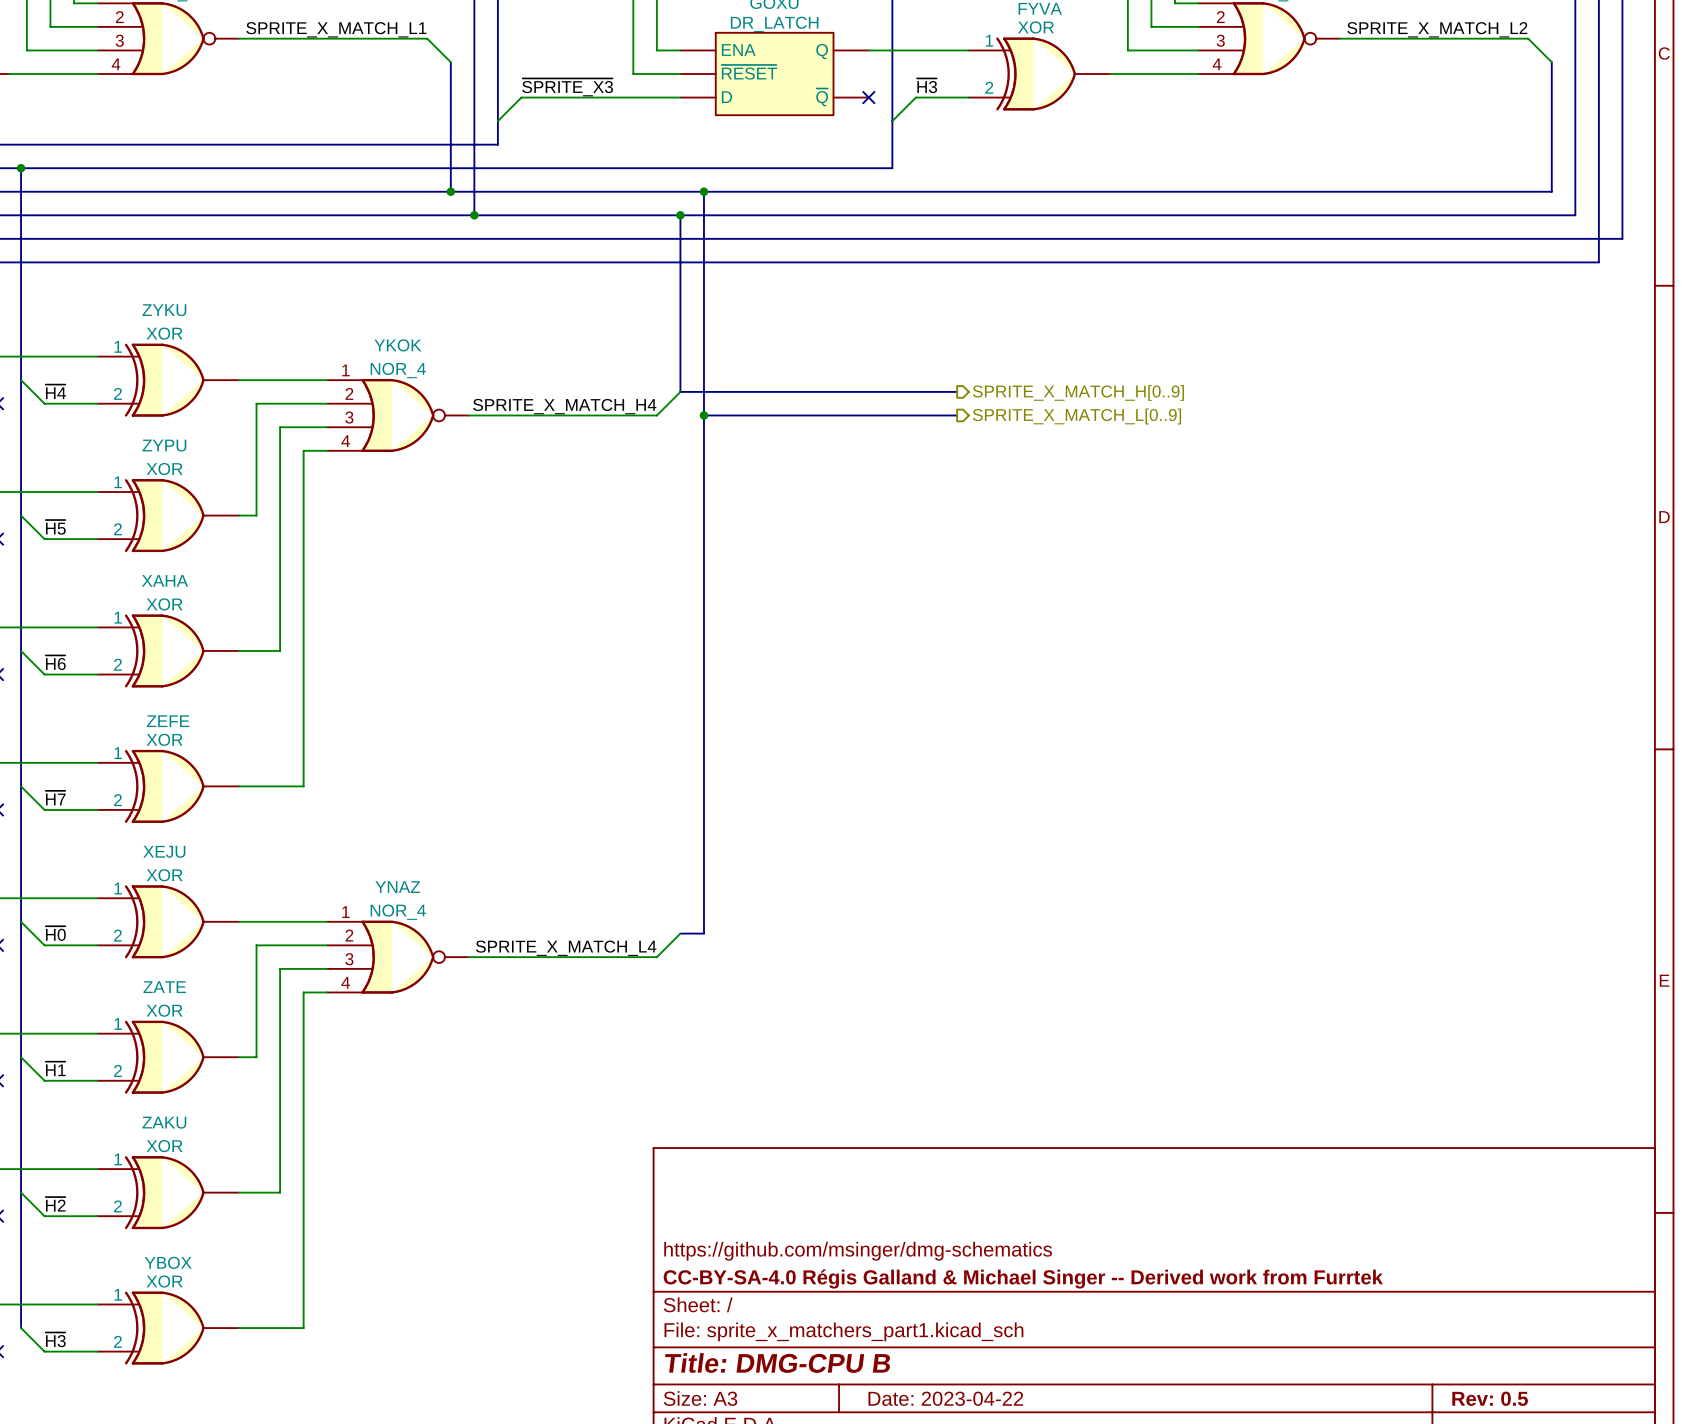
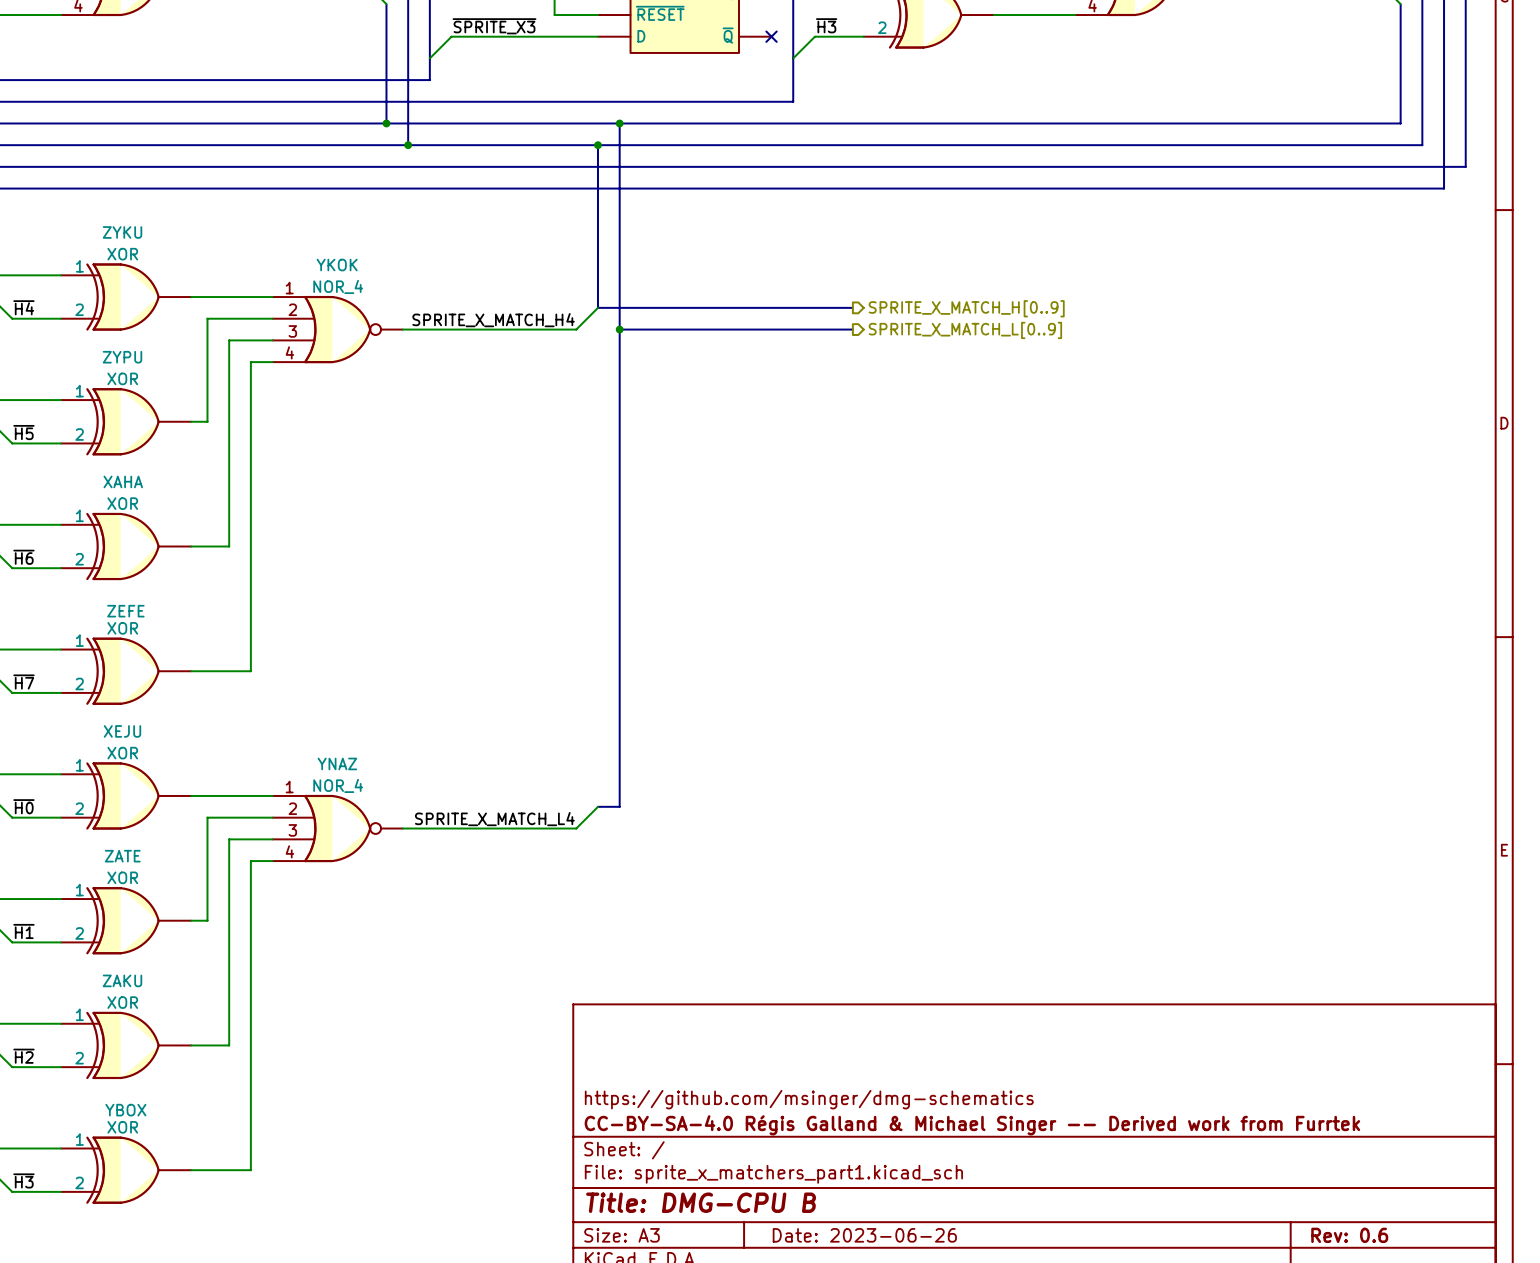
title block: Date: 2023-04-22 (945, 1398) -> Date: 2023-06-26 (864, 1235)
title block: Rev: 0.5 (1490, 1398) -> Rev: 0.6 (1349, 1235)

